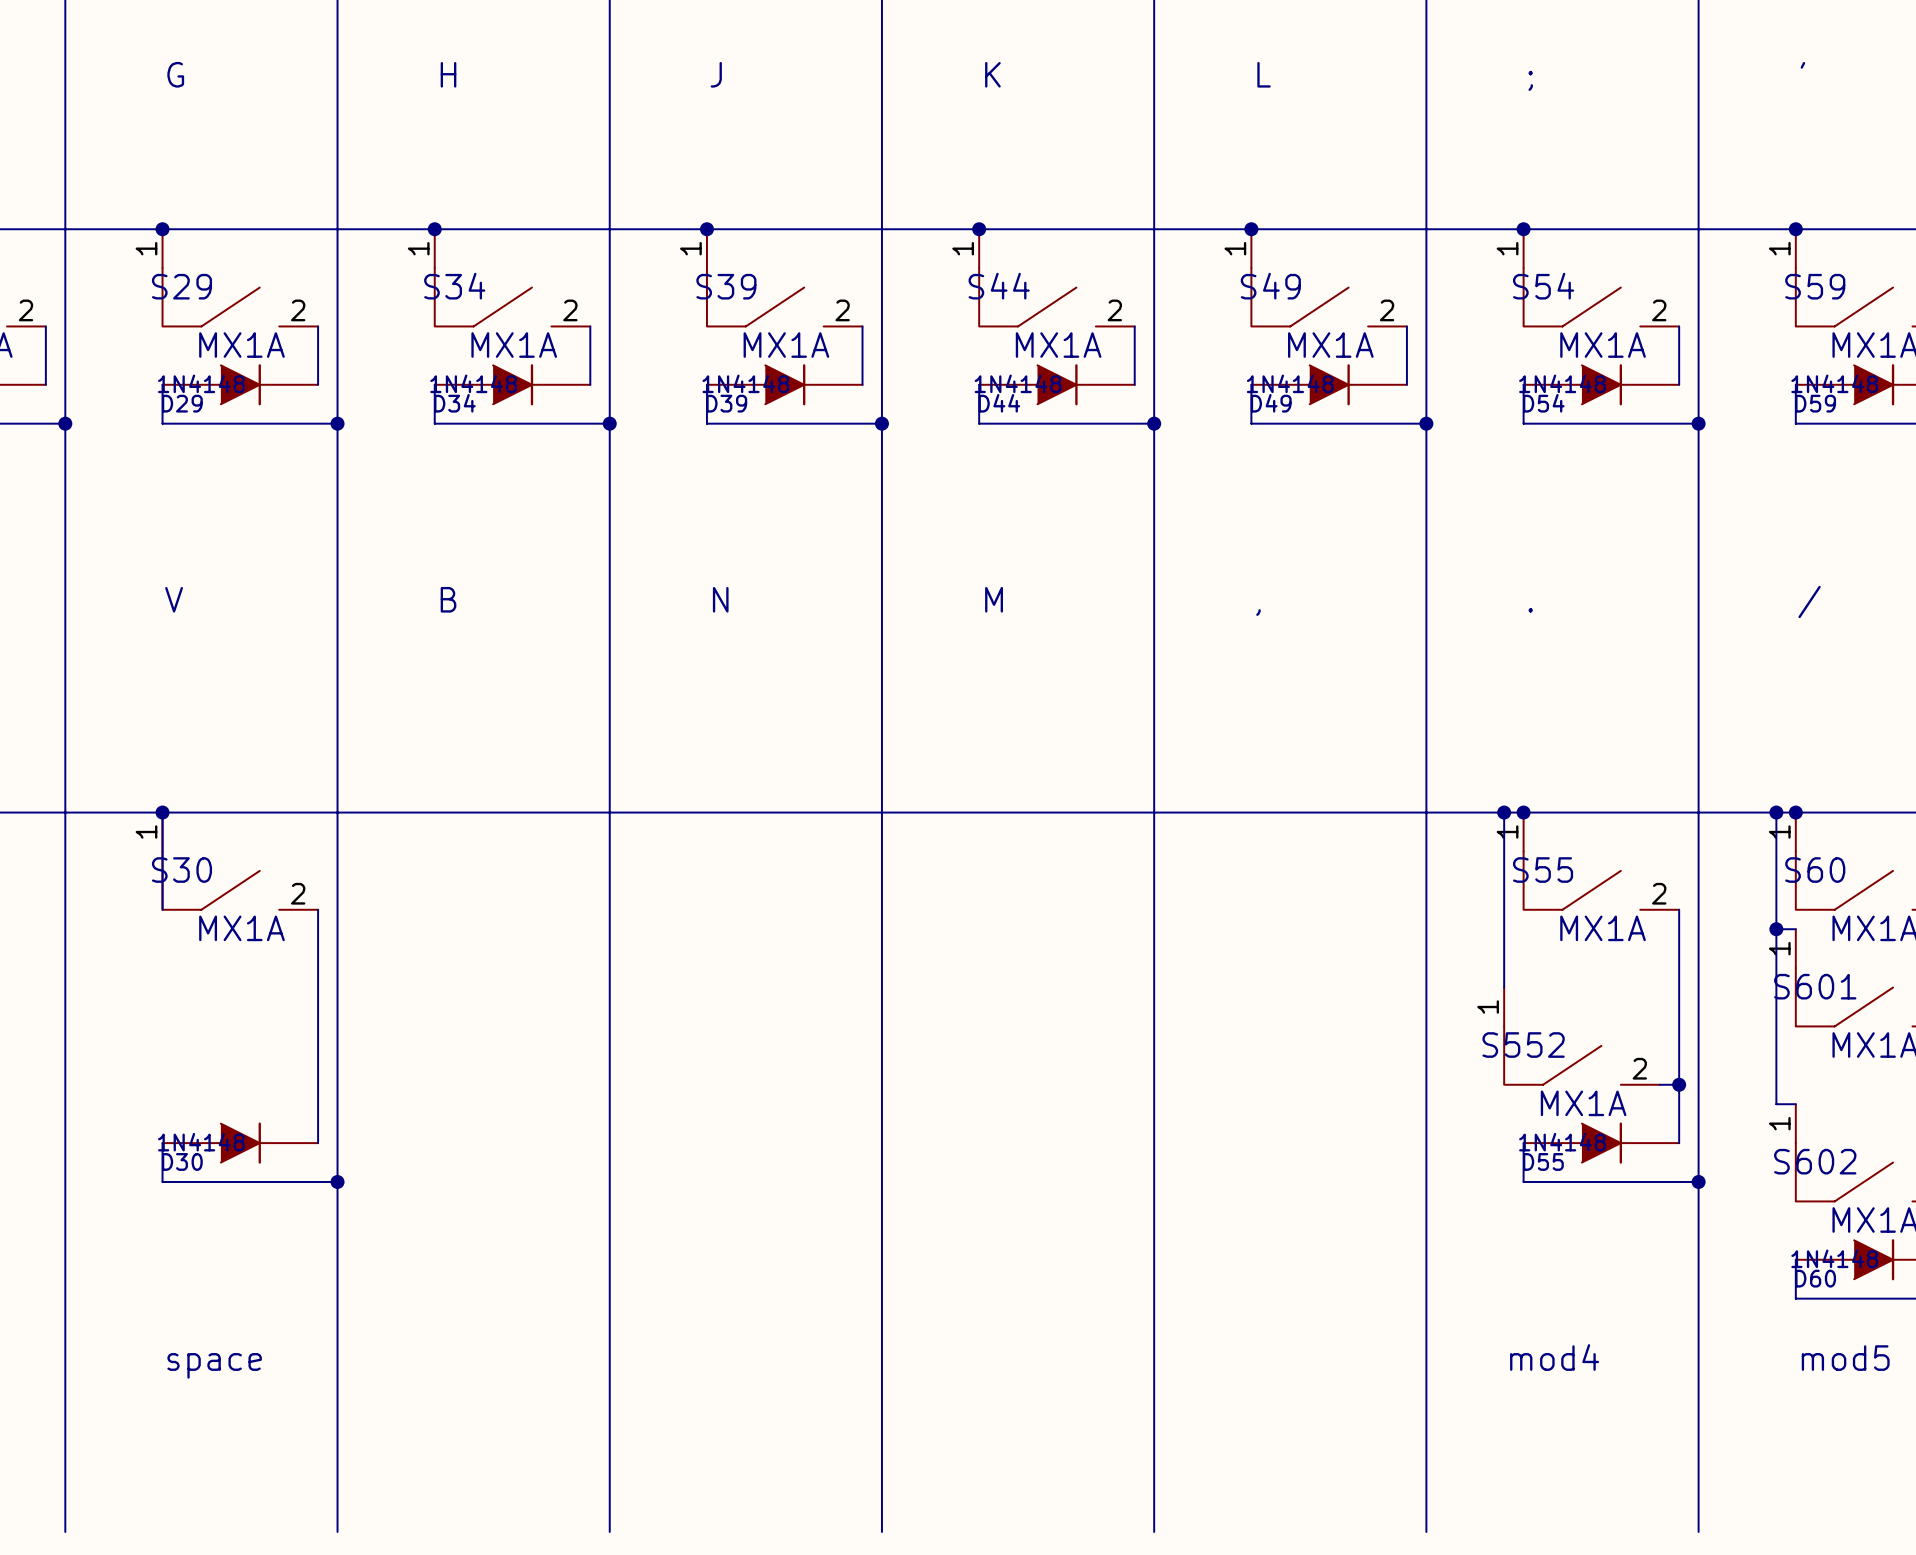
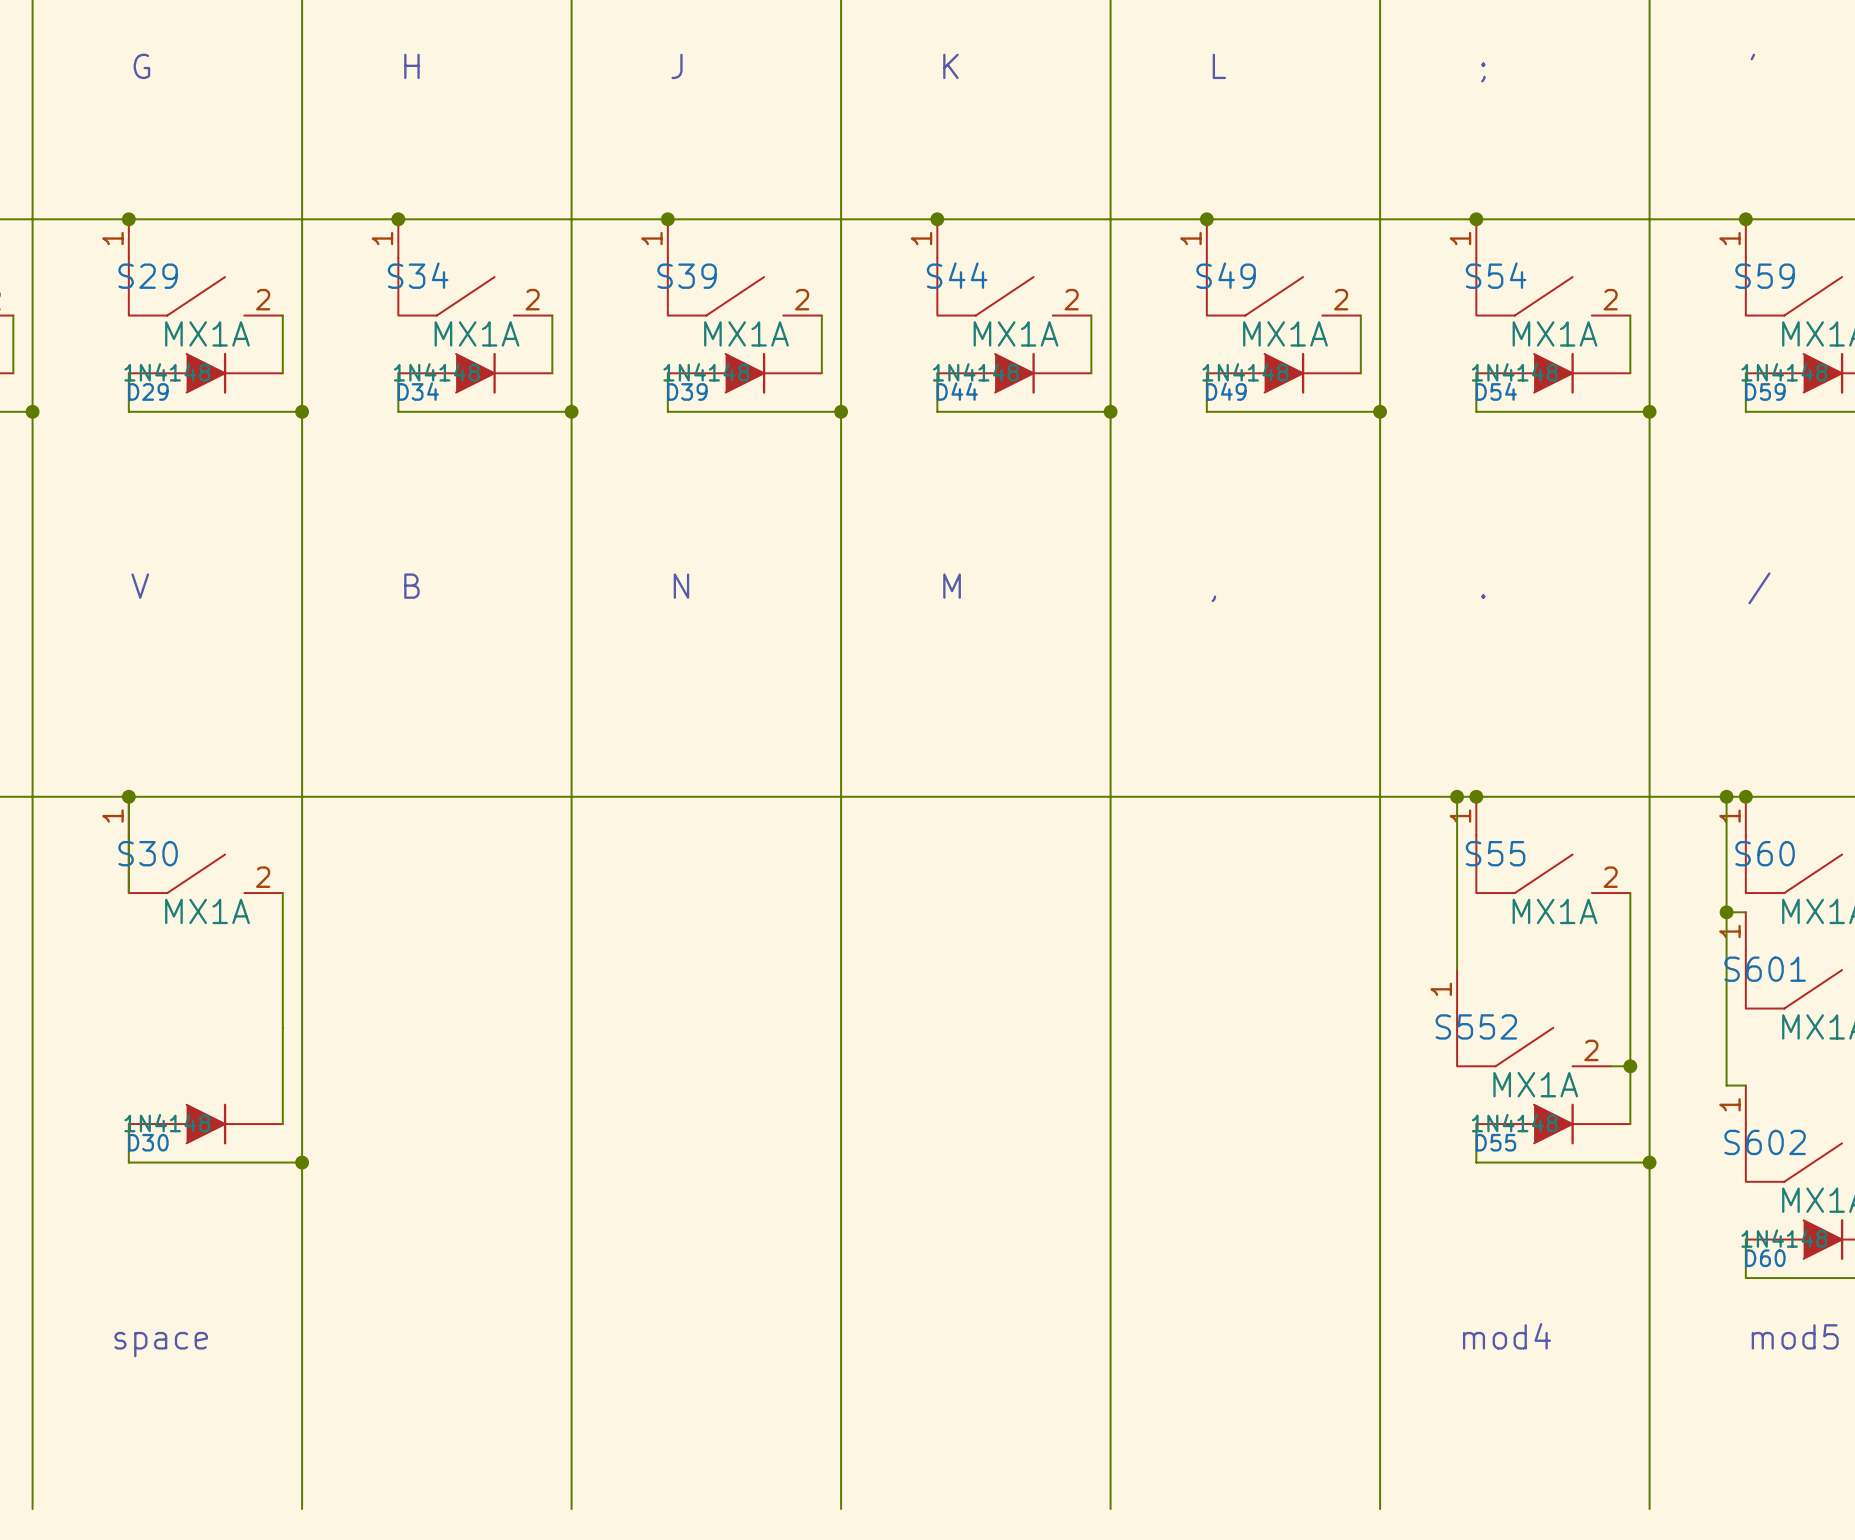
text position: space (214, 1365) -> space (161, 1344)

